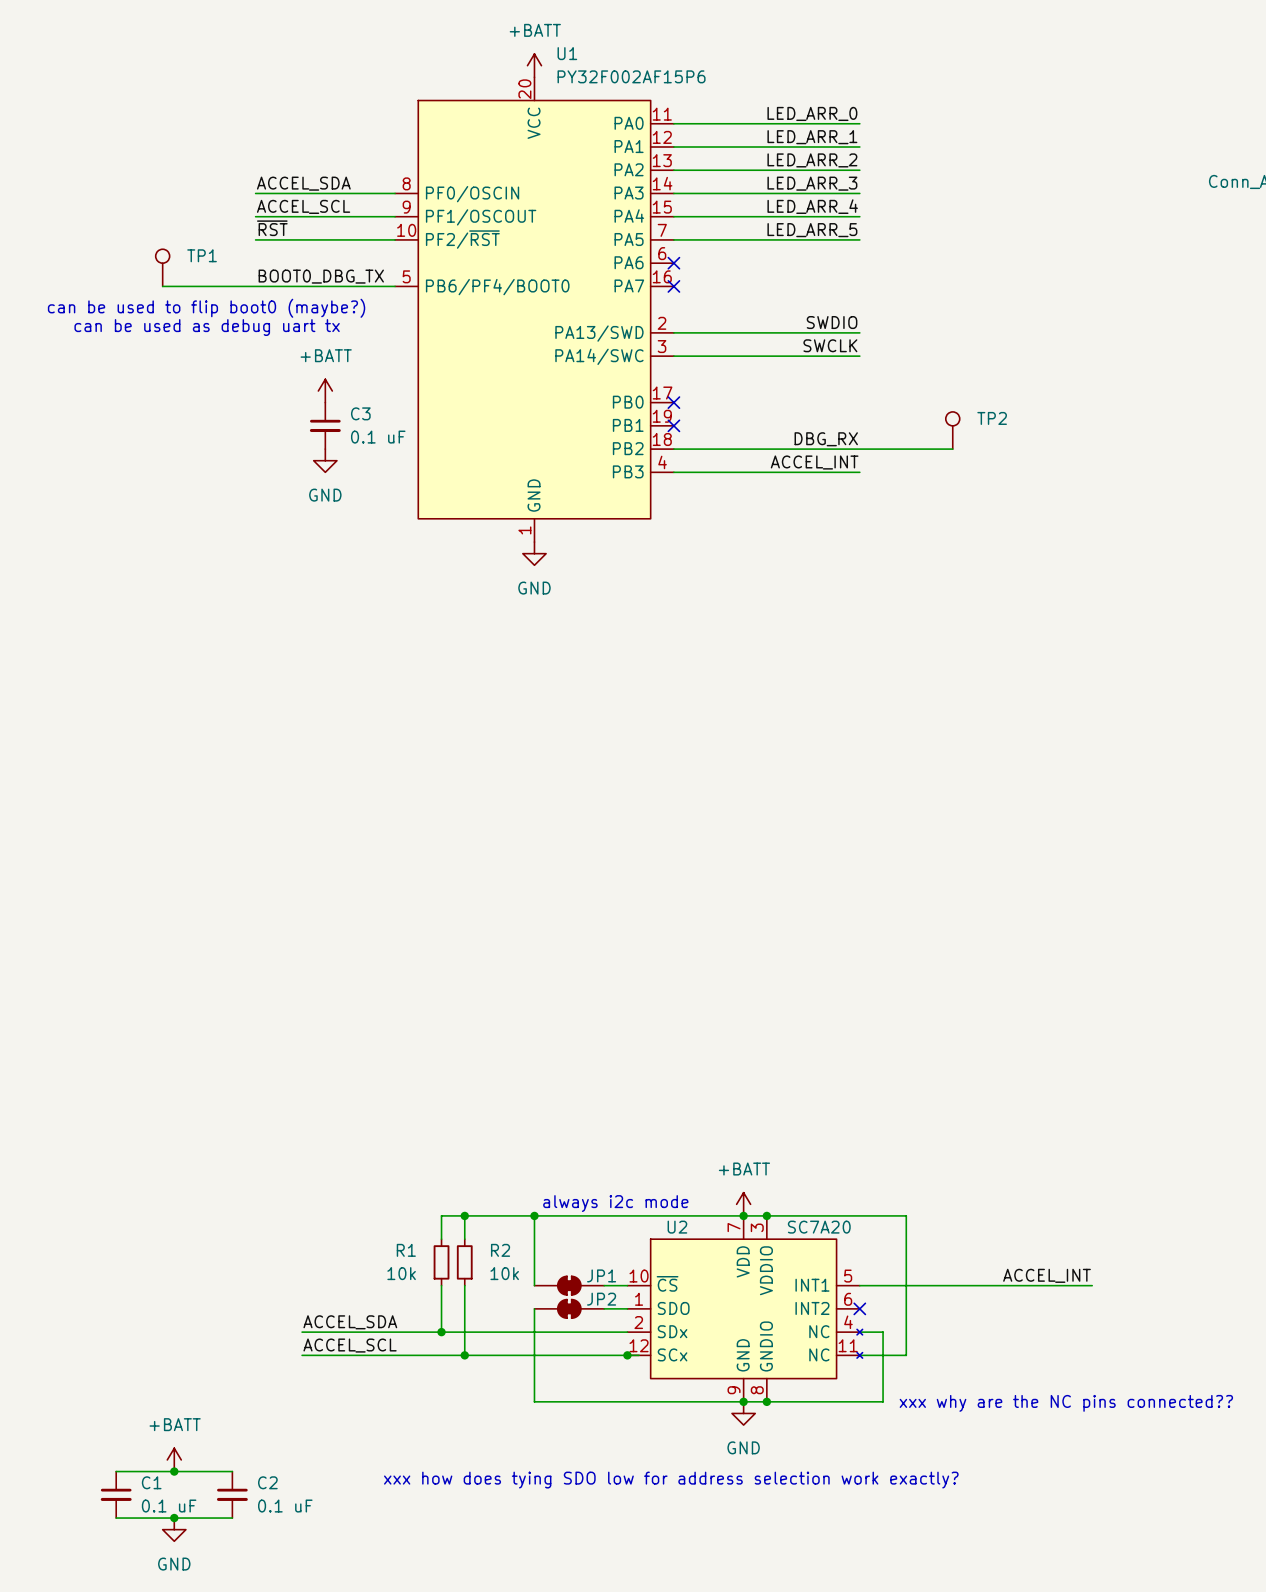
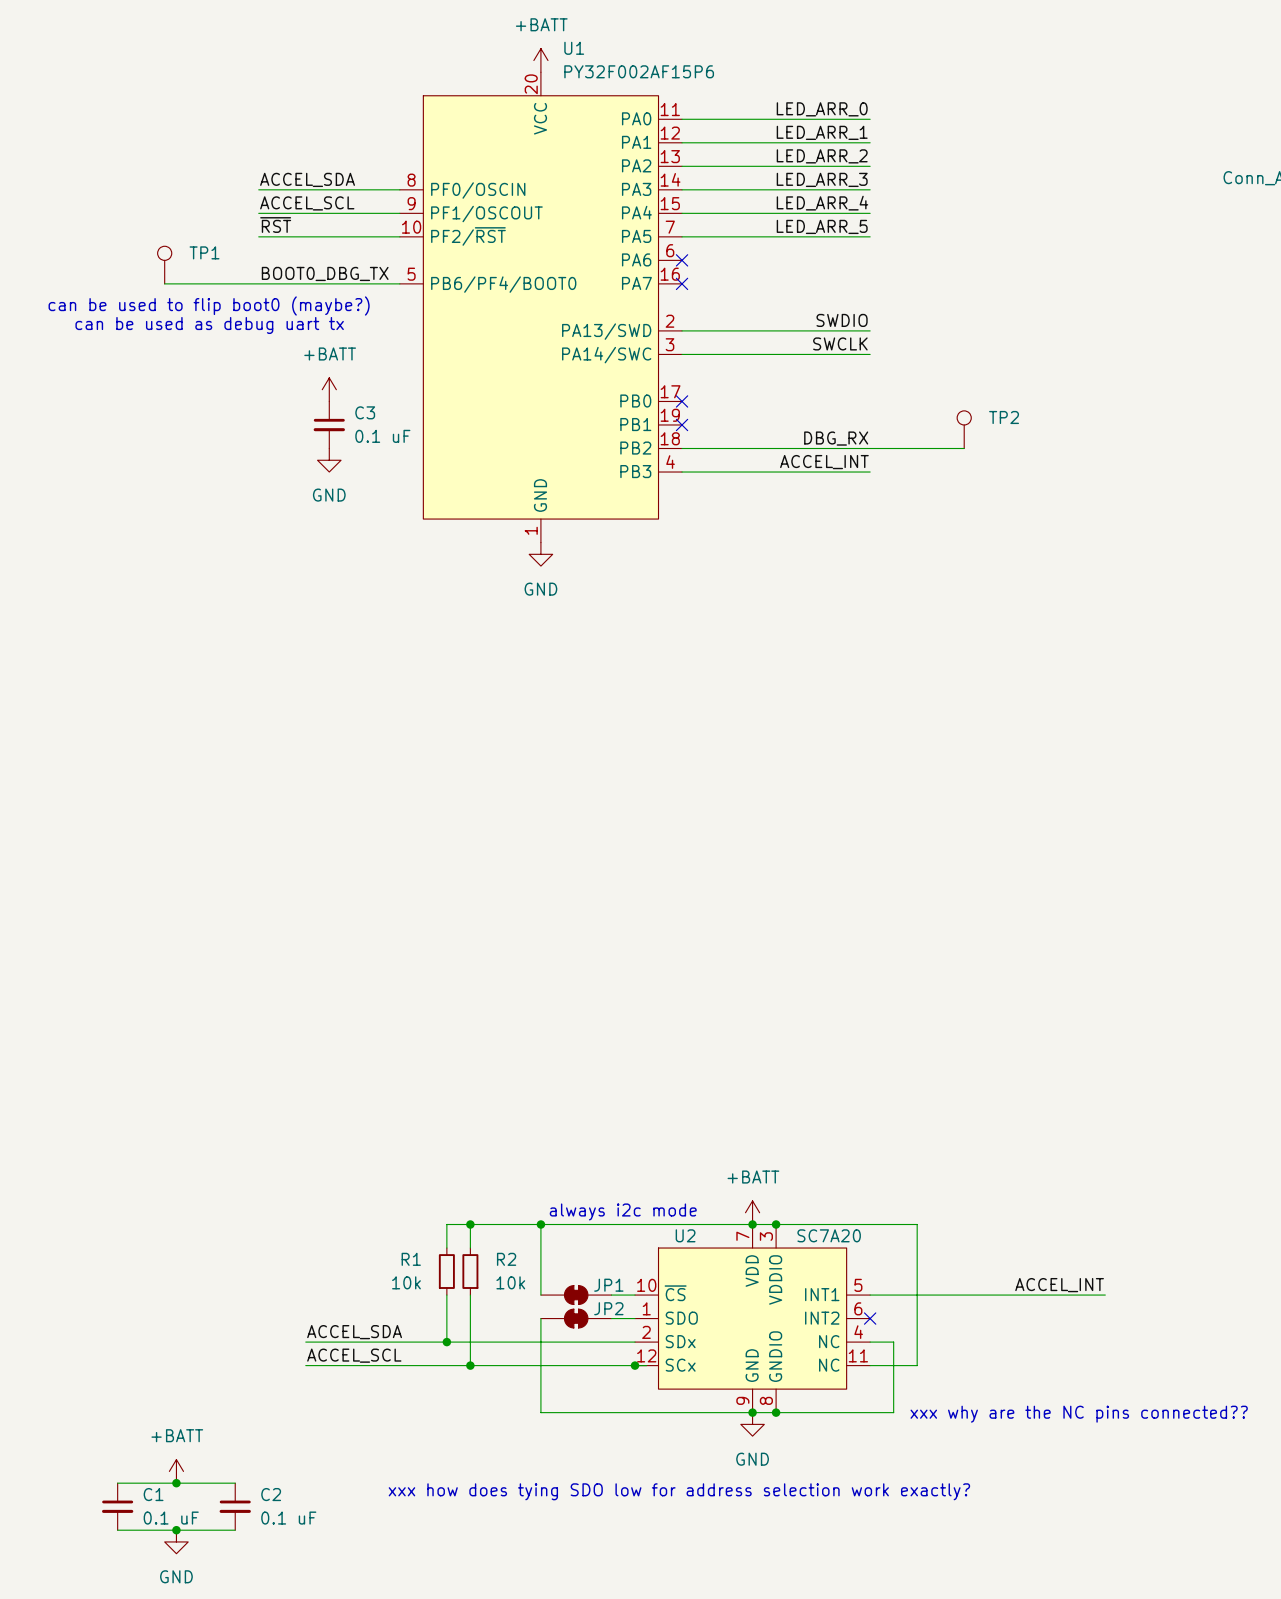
U2 symbol: [627, 1215, 863, 1402] -> [634, 1224, 871, 1413]

